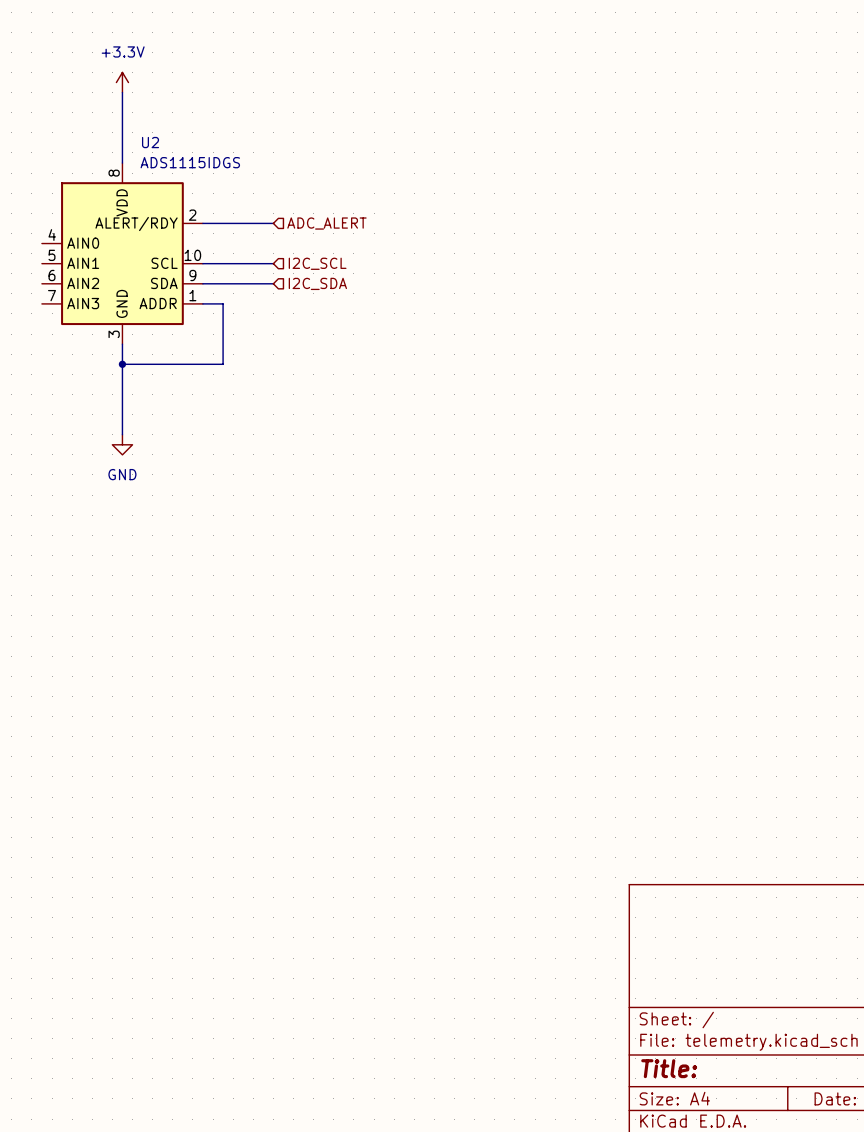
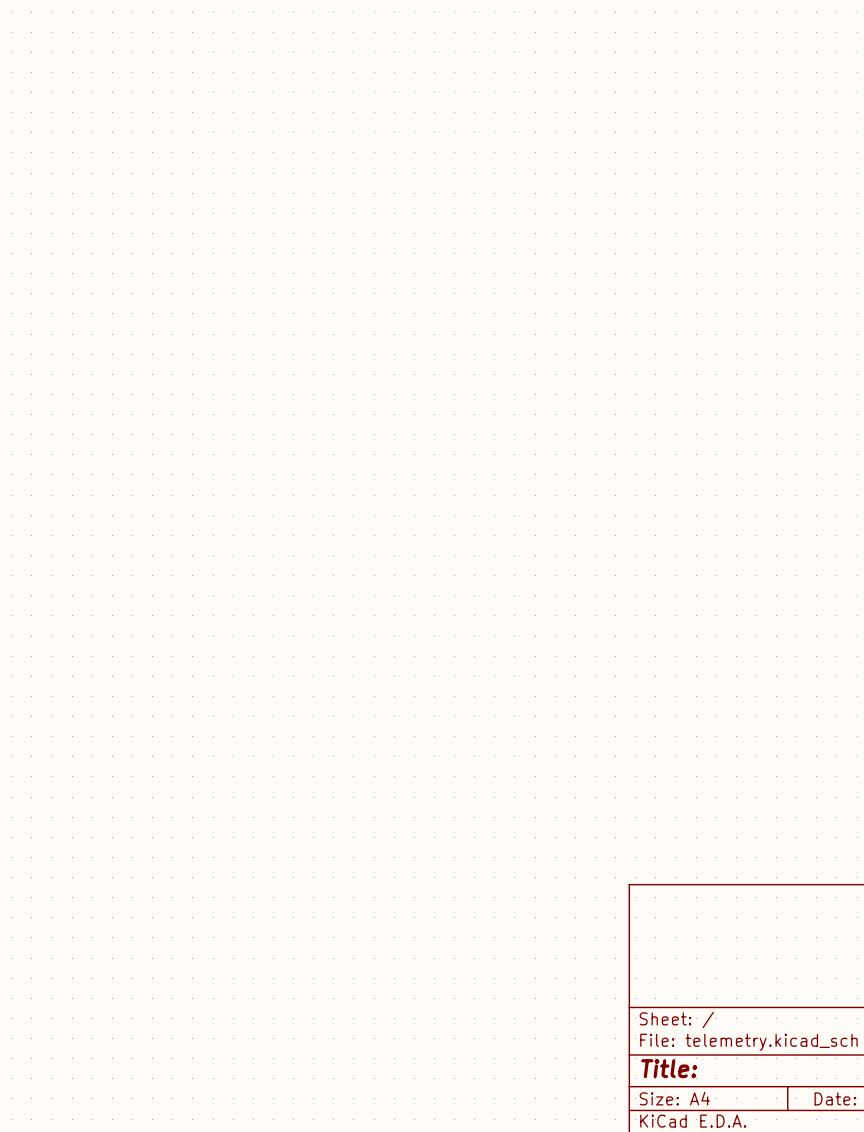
power symbol: +3.3V (122, 82) -> none
wire: (122, 92) (122, 163) -> none
wire: (202, 223) (273, 223) -> none
hierarchical label: ADC_ALERT (326, 223) -> none
U2: ADS1115IDGS (122, 253) -> none
wire: (202, 263) (273, 263) -> none
hierarchical label: I2C_SCL (317, 263) -> none
wire: (202, 283) (273, 283) -> none
hierarchical label: I2C_SDA (317, 283) -> none
wire: (202, 303) (223, 303) (223, 364) (122, 364) -> none
wire: (122, 344) (122, 434) -> none
junction: (122, 364) -> none
power symbol: GND (122, 444) -> none

